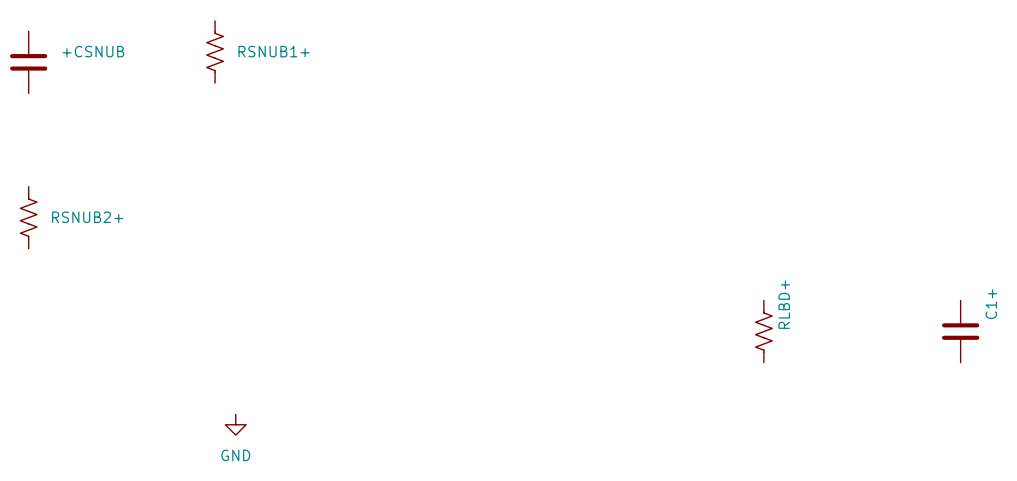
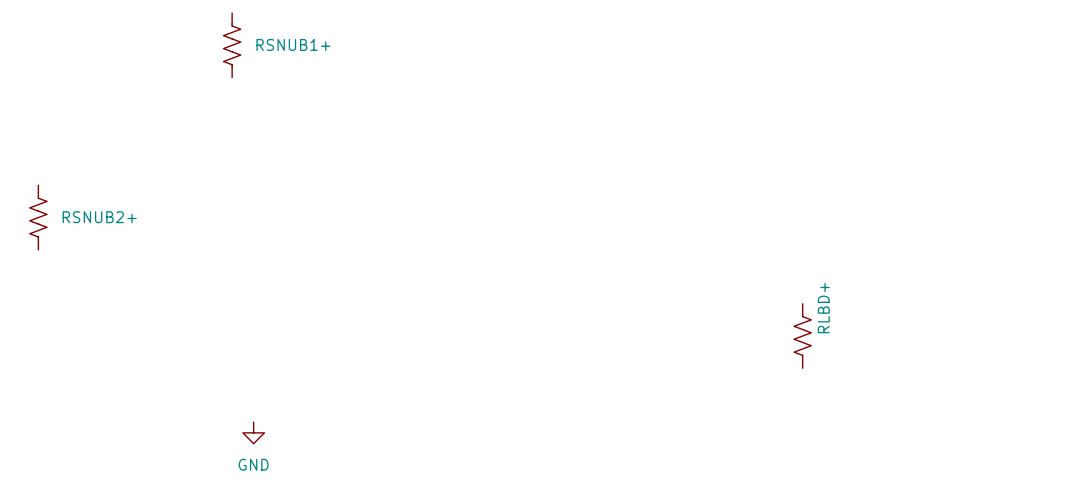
+CSNUB: (28, 62) -> none
C1+: (960, 331) -> none

